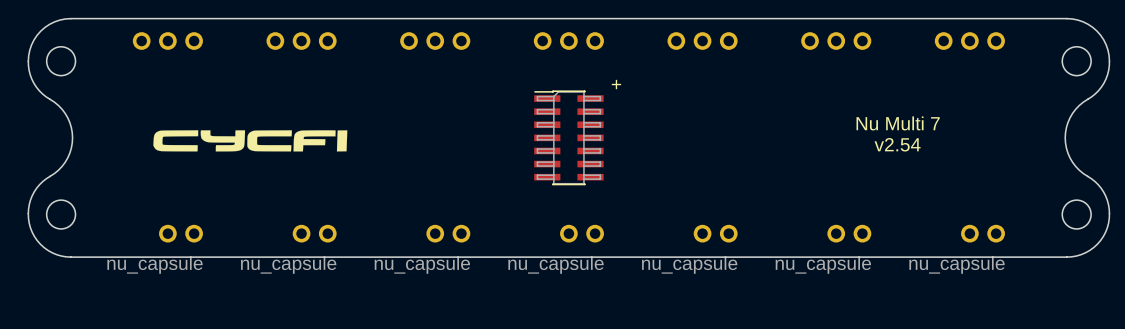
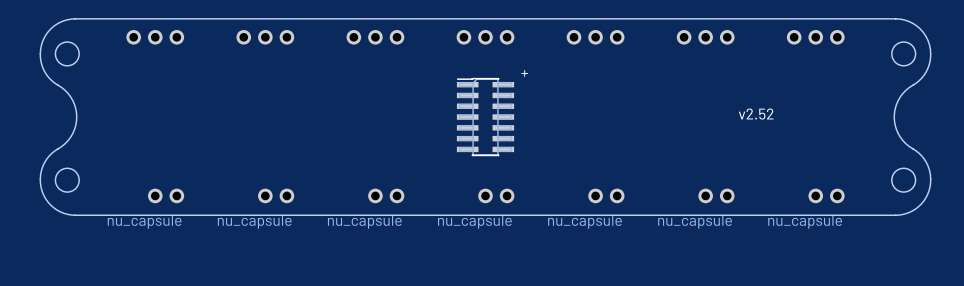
text: Nu Multi 7 (898, 123) -> none
drawing: [153, 130, 348, 152] -> none
text: v2.54 (897, 144) -> v2.52 (756, 114)

